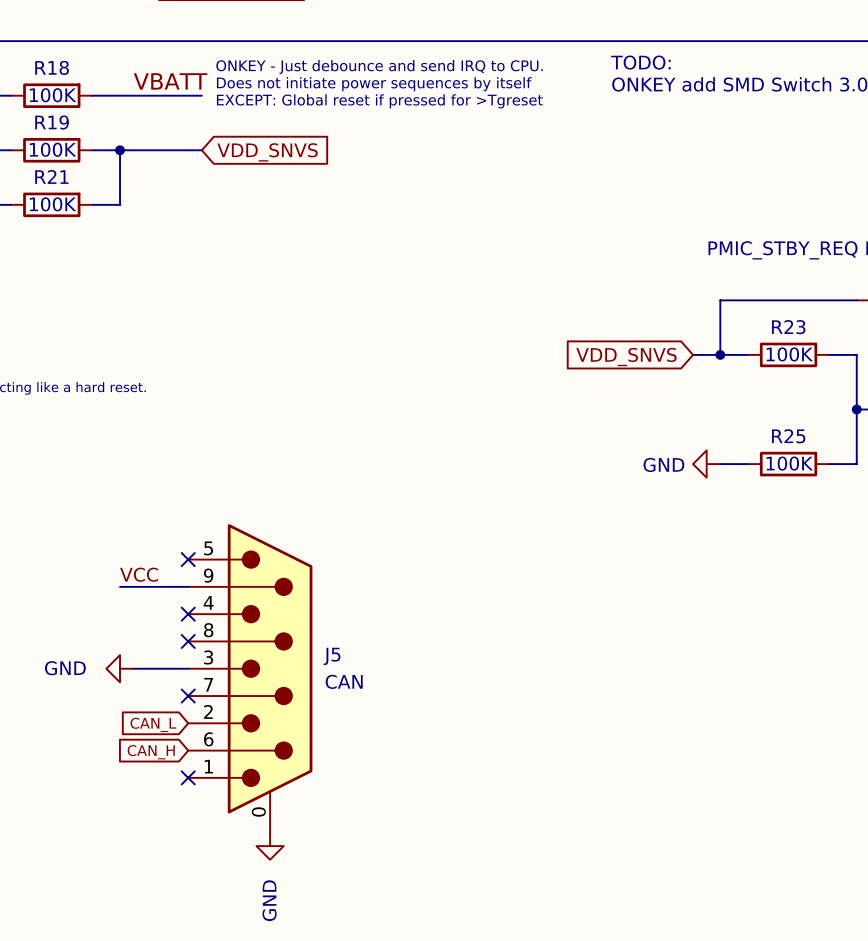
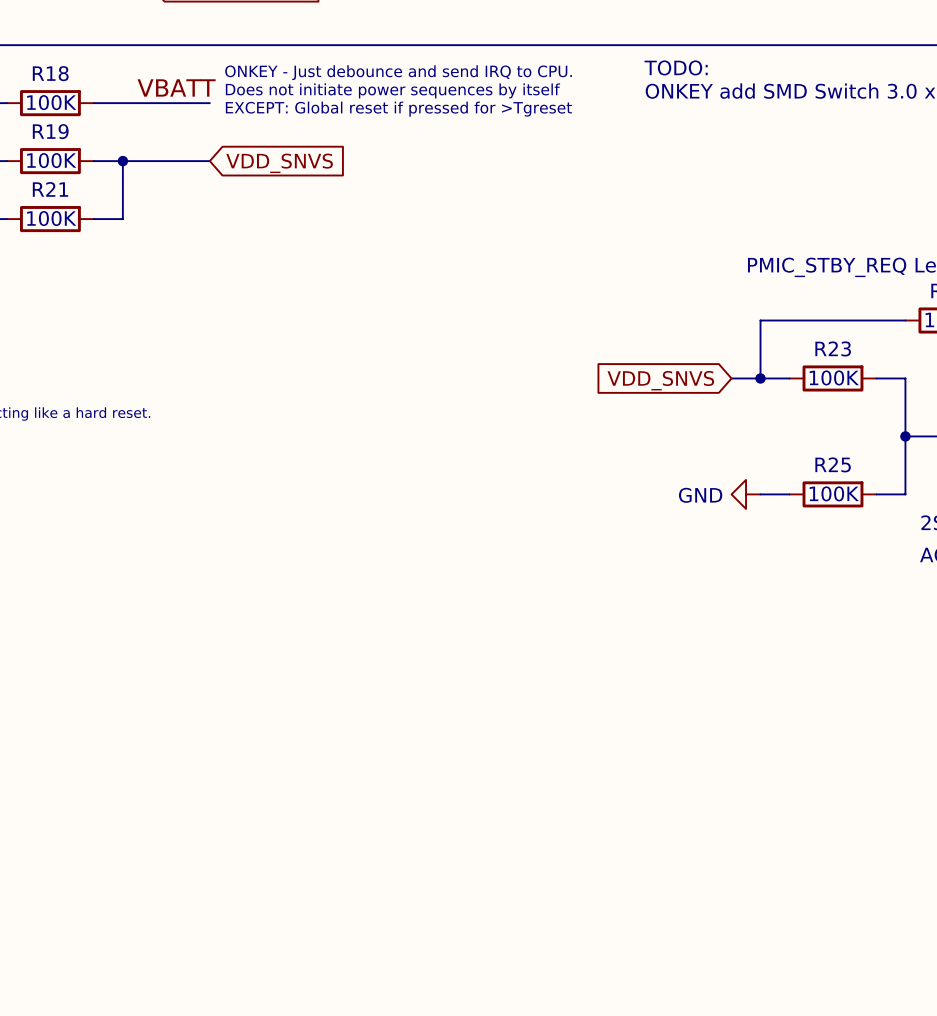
no-connect mark: (188, 559) -> none
label: VCC (139, 574) -> none
wire: (120, 586) (188, 586) -> none
no-connect mark: (188, 614) -> none
no-connect mark: (188, 641) -> none
power symbol: GND (120, 668) -> none
wire: (133, 668) (188, 668) -> none
J5: CAN (250, 678) -> none
no-connect mark: (188, 696) -> none
global label: CAN_L (153, 724) -> none
global label: CAN_H (151, 752) -> none
no-connect mark: (188, 777) -> none
power symbol: GND (270, 846) -> none

